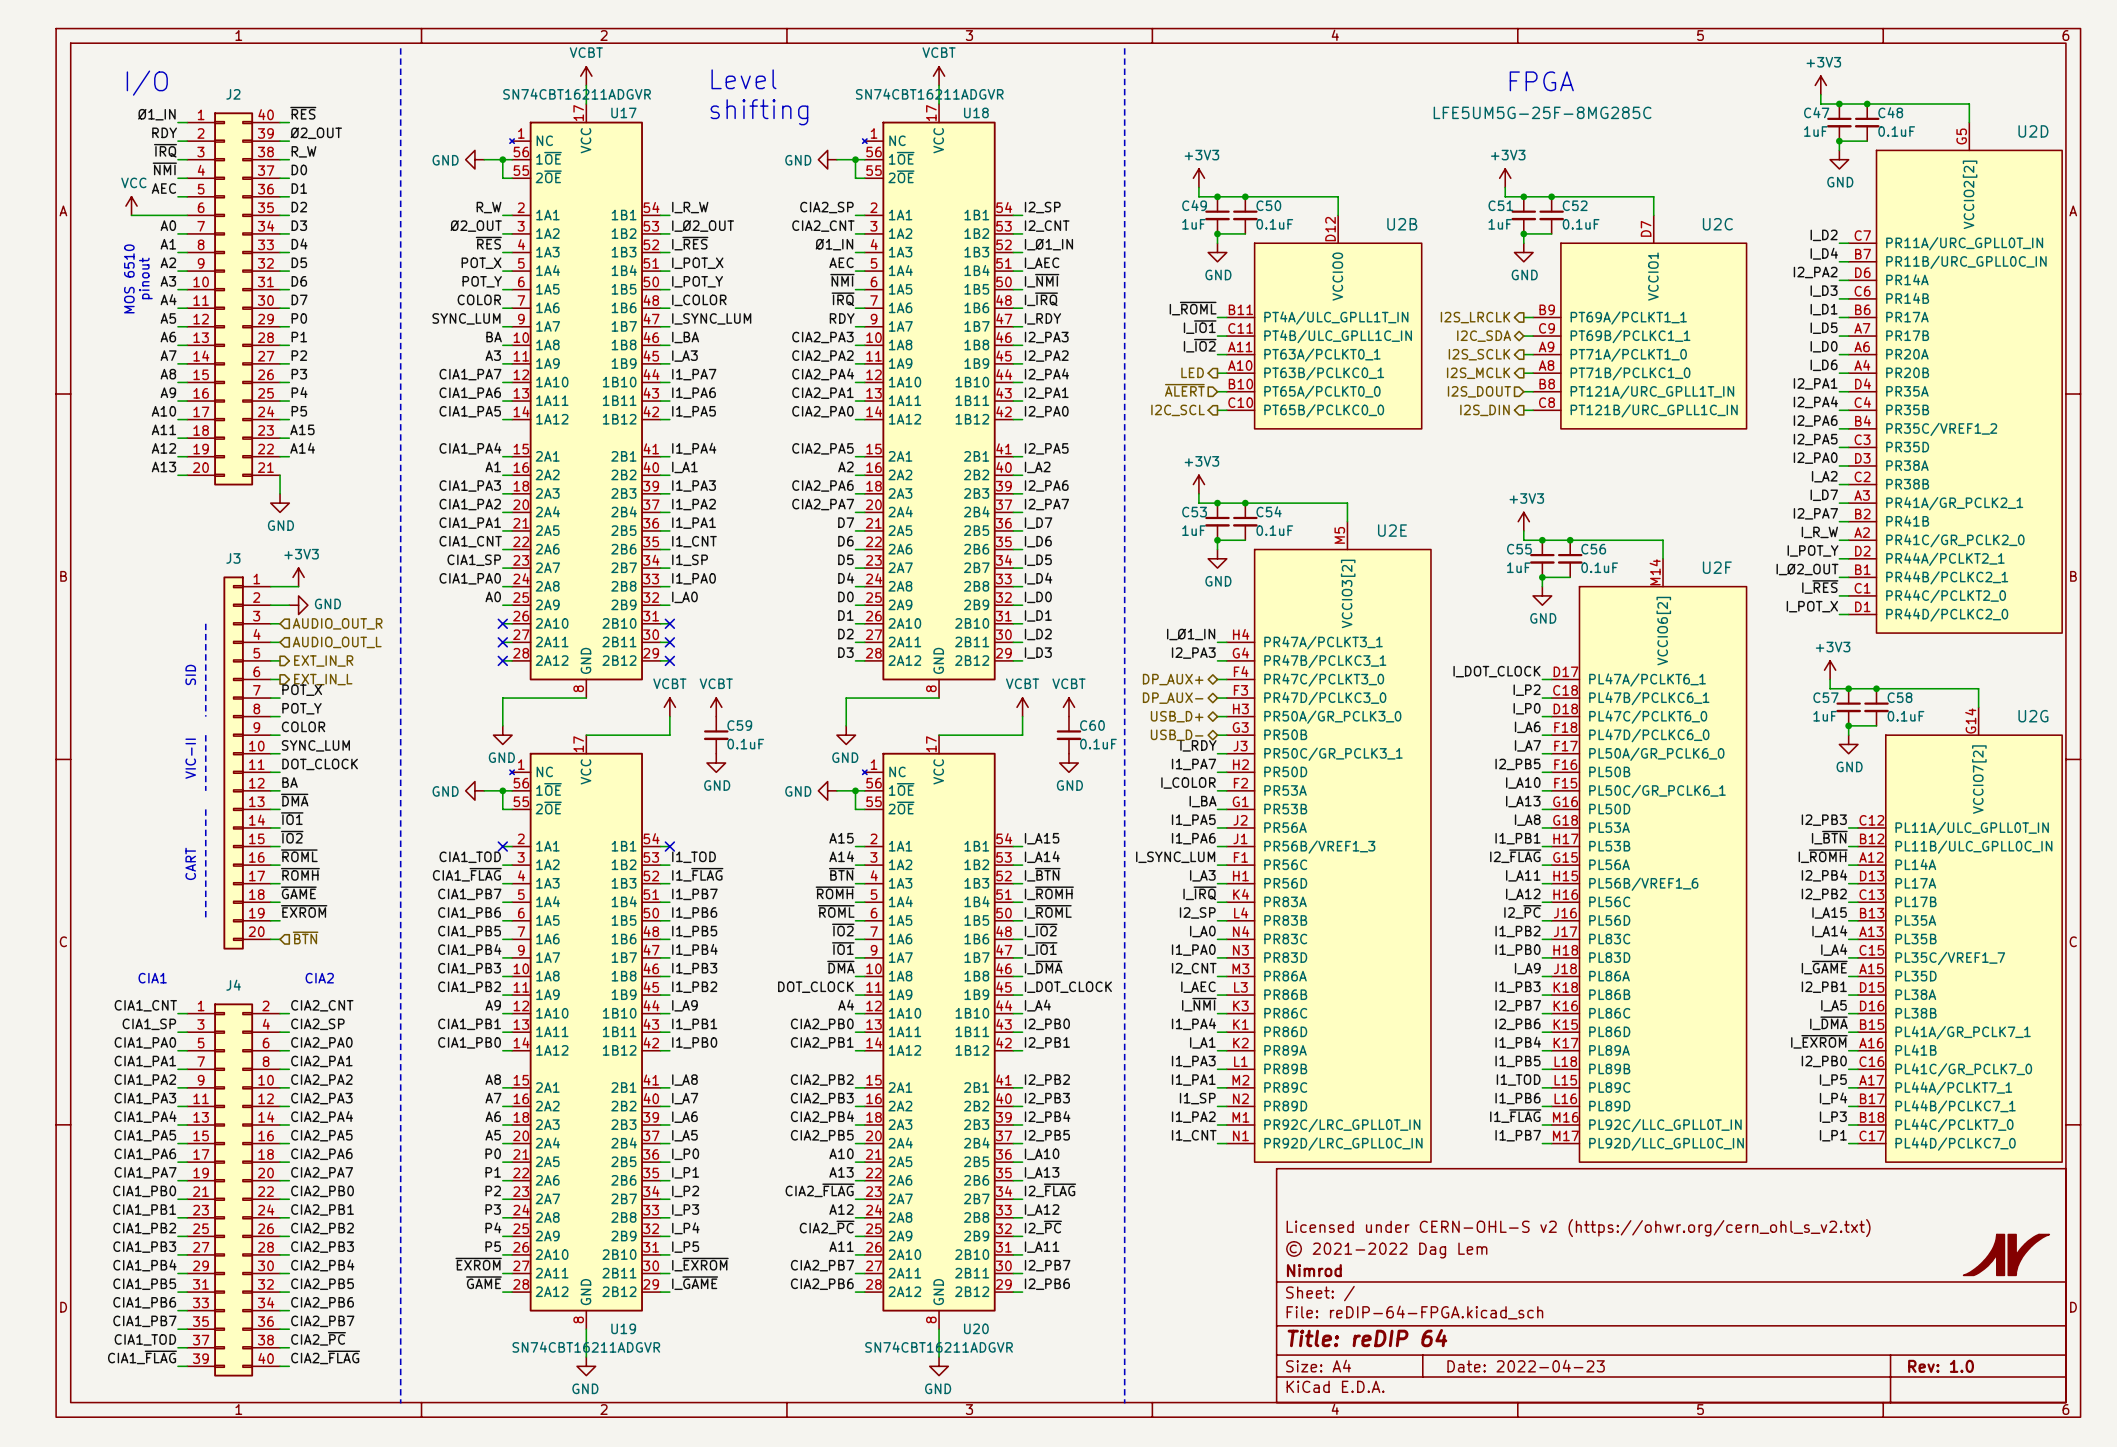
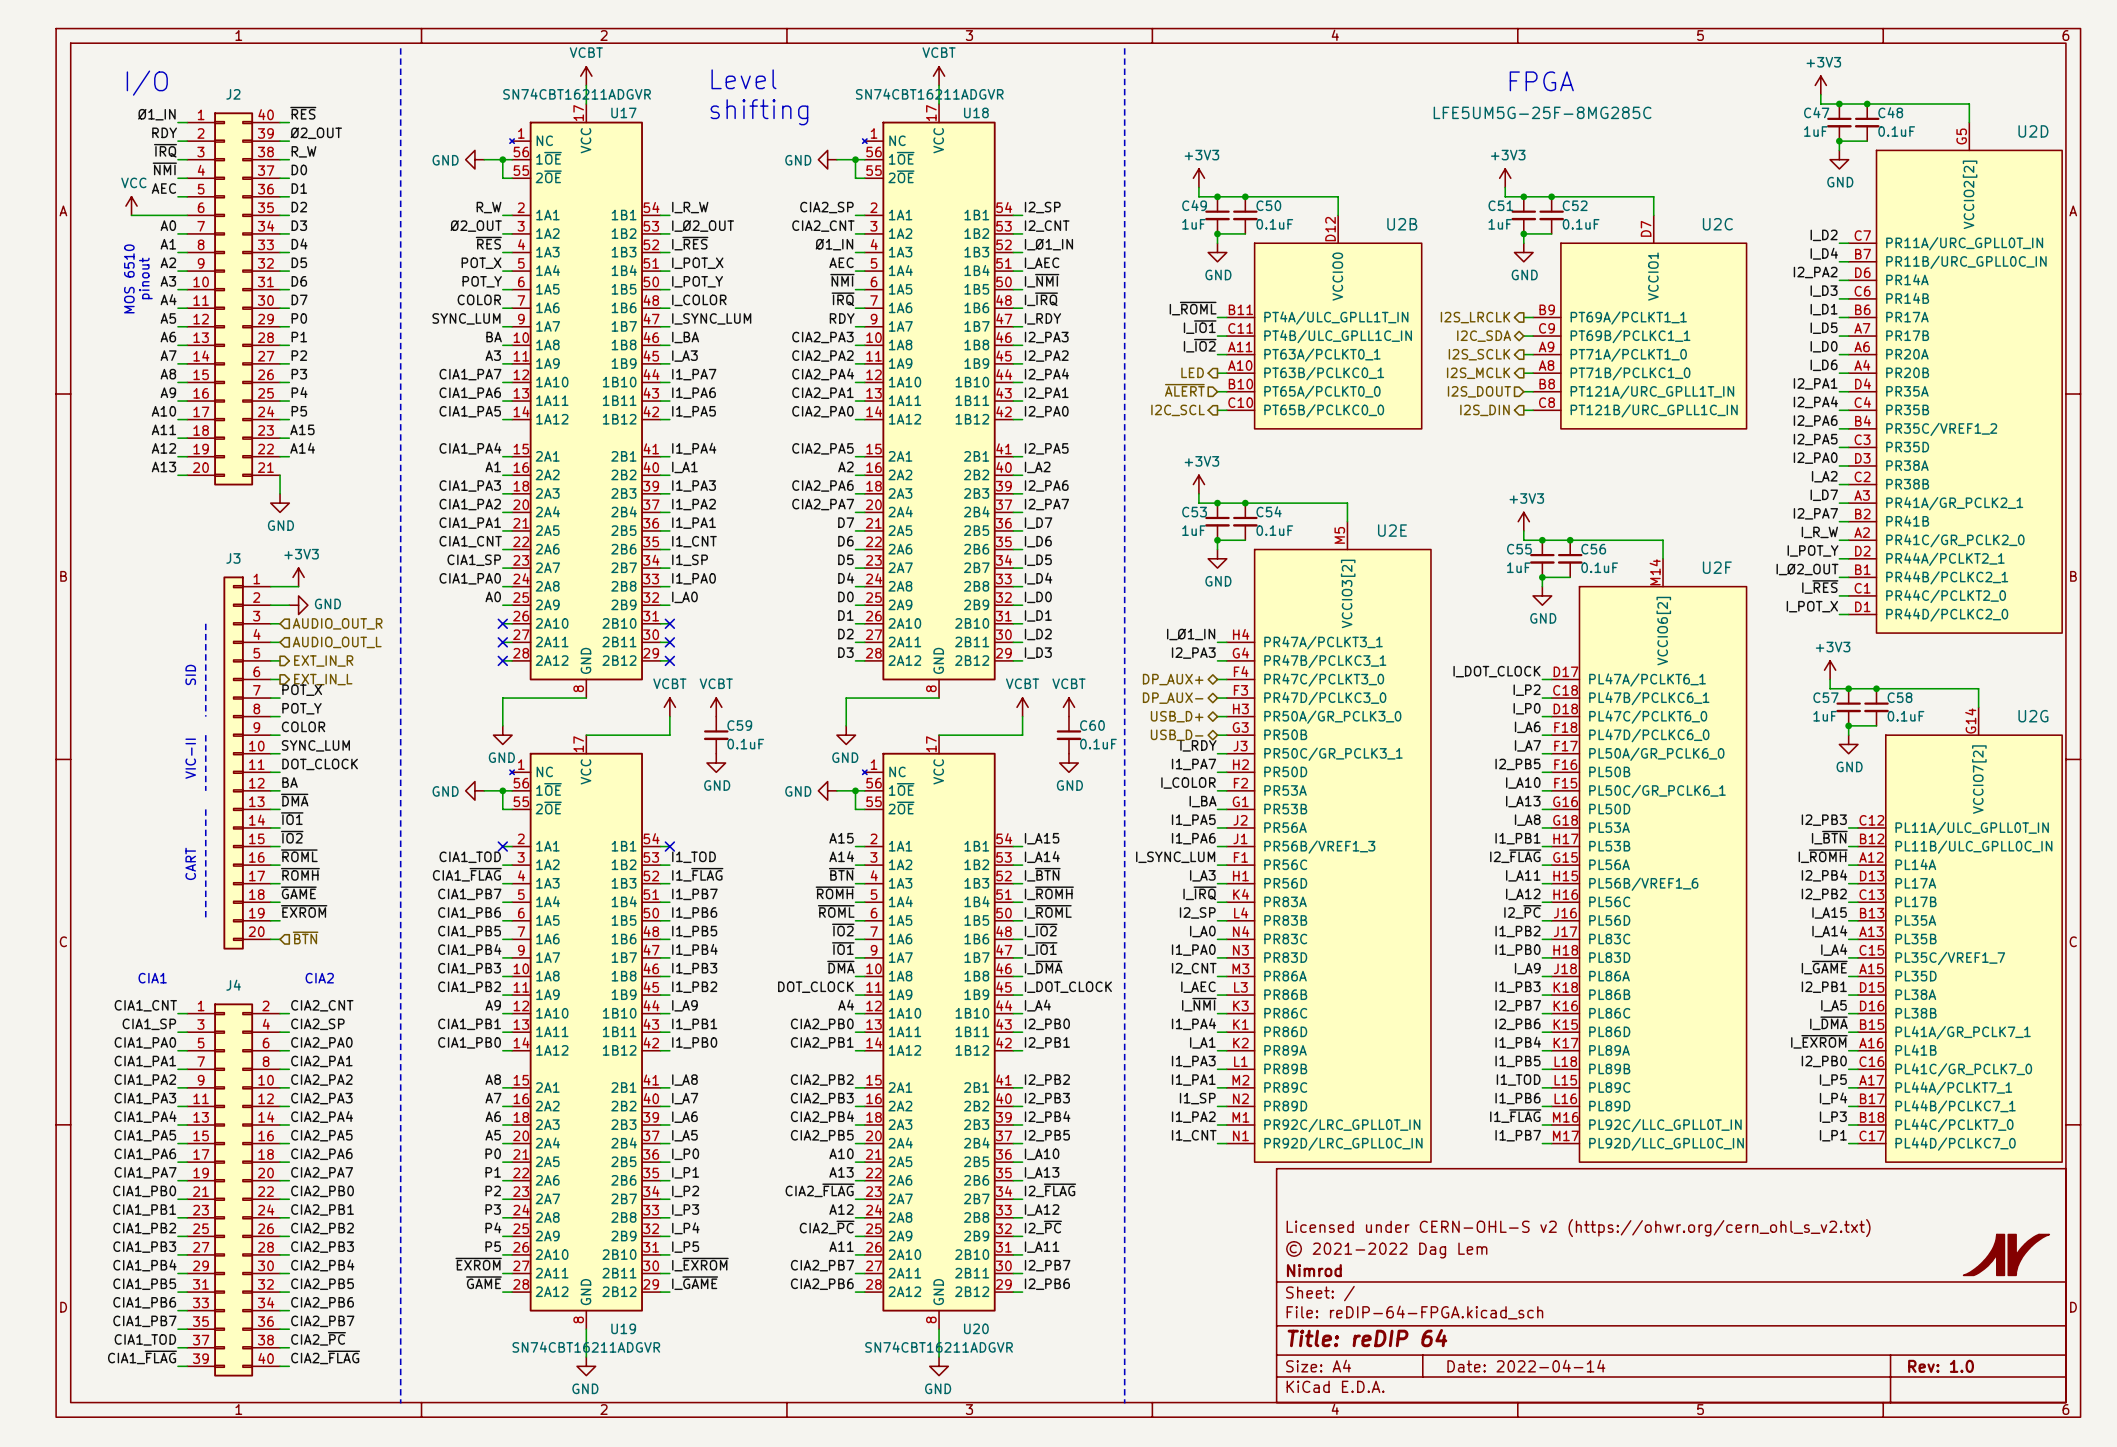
title block: Date: 2022-04-23 (1526, 1366) -> Date: 2022-04-14 (1526, 1366)

